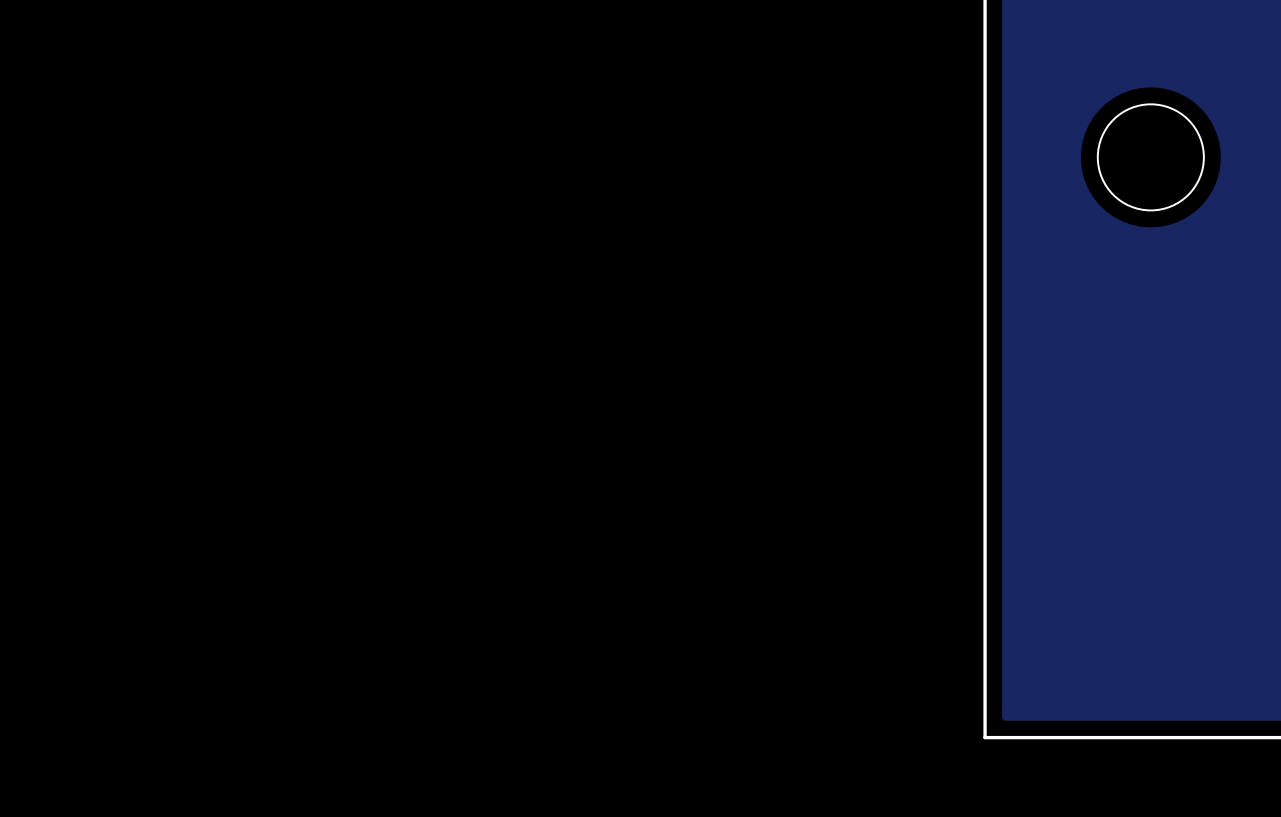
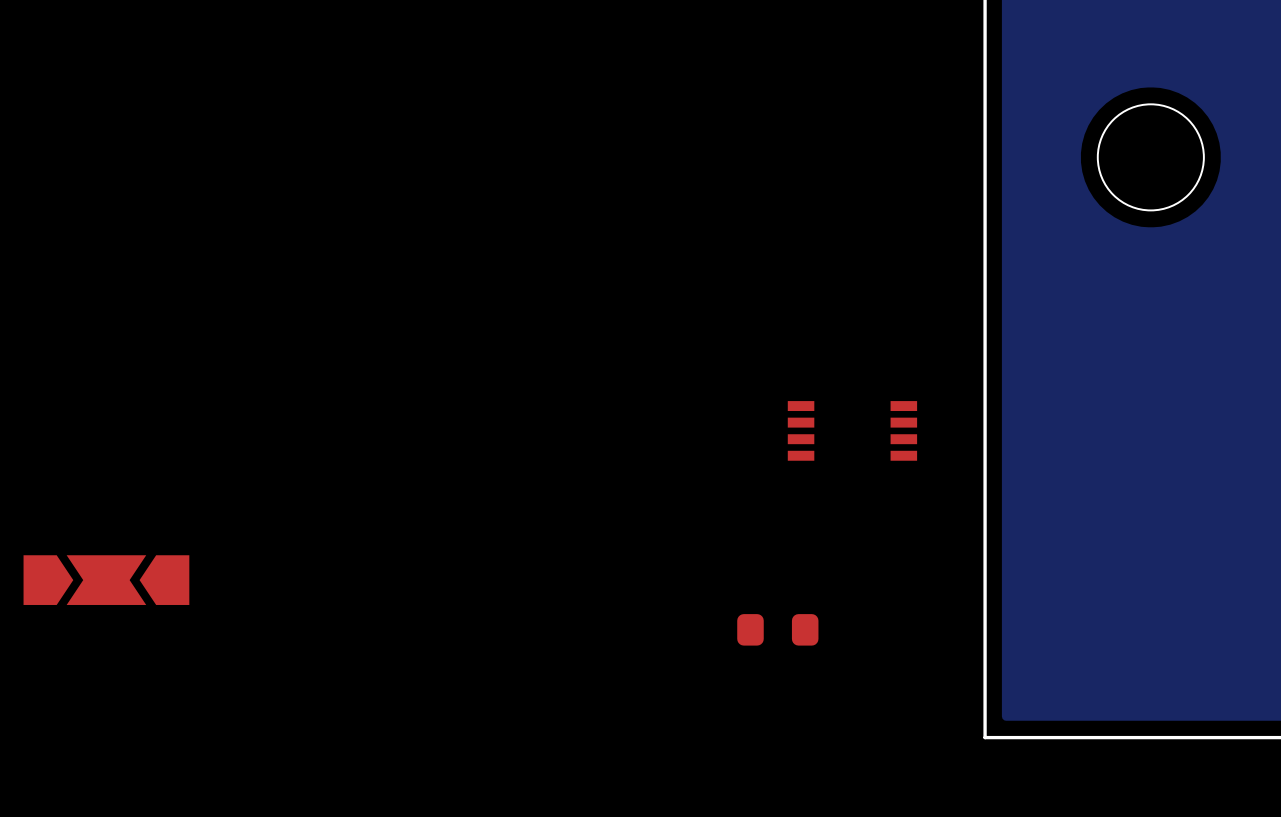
part: none -> (852, 430)
part: none -> (106, 580)
part: none -> (777, 629)

